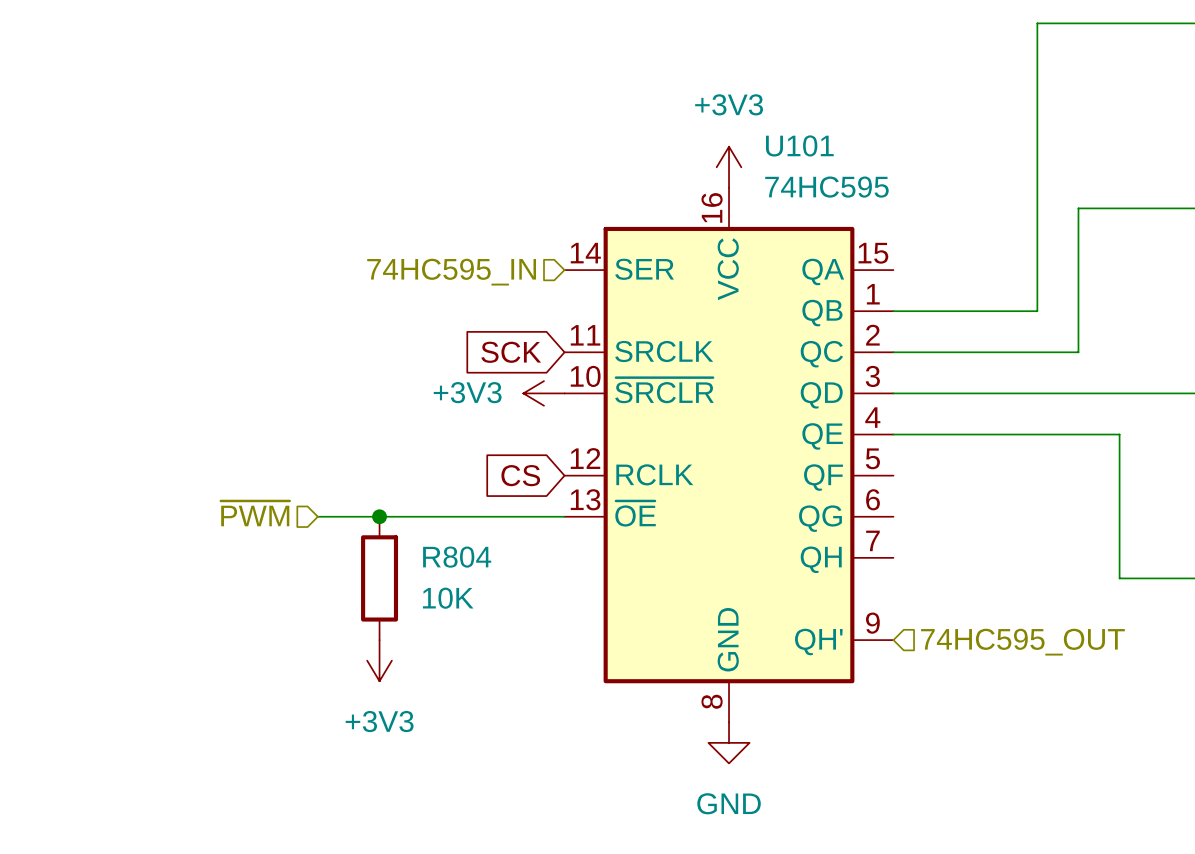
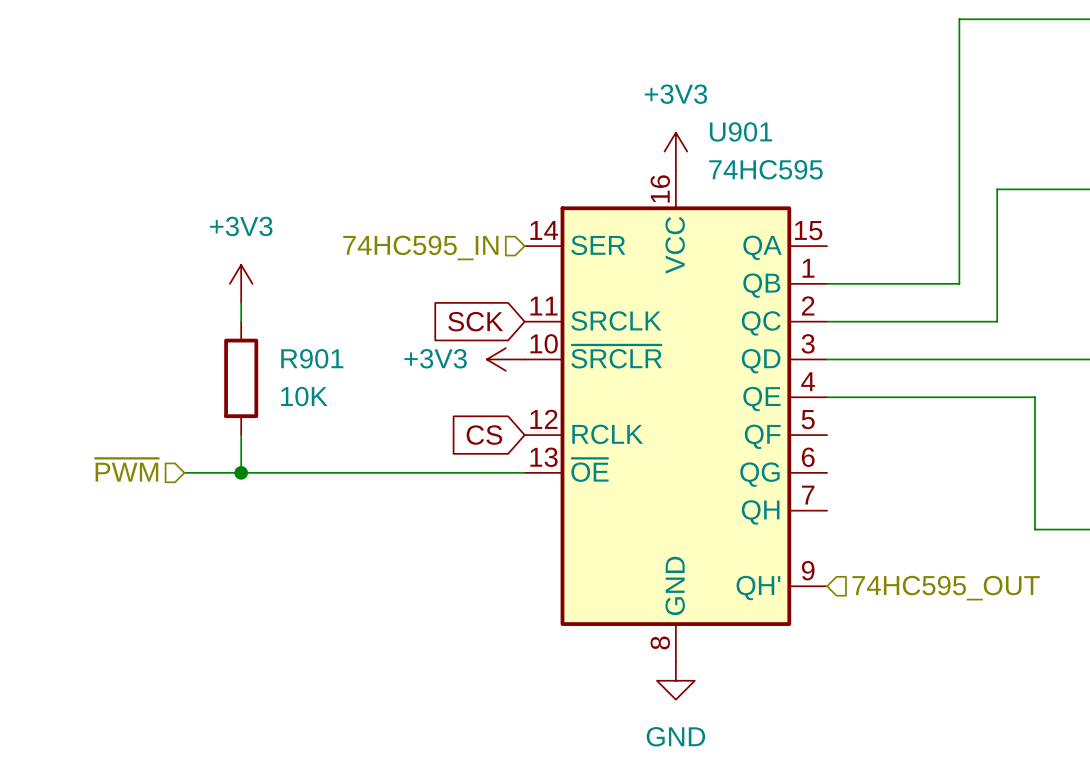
U101 name: U101 (799, 145) -> U901 (741, 131)
wire: none -> (241, 302) (241, 321)
R901: none -> 10K (241, 378)
wire: none -> (241, 435) (241, 472)
hierarchical label position: ~{PWM} (255, 513) -> ~{PWM} (126, 469)
wire: none -> (184, 472) (297, 472)
junction: none -> (241, 472)
junction: (379, 516) -> none
R804: 10K (379, 578) -> none
power symbol rotation: 0° (379, 660) -> 180° (241, 283)
power symbol position: +3V3 (379, 660) -> +3V3 (241, 283)

